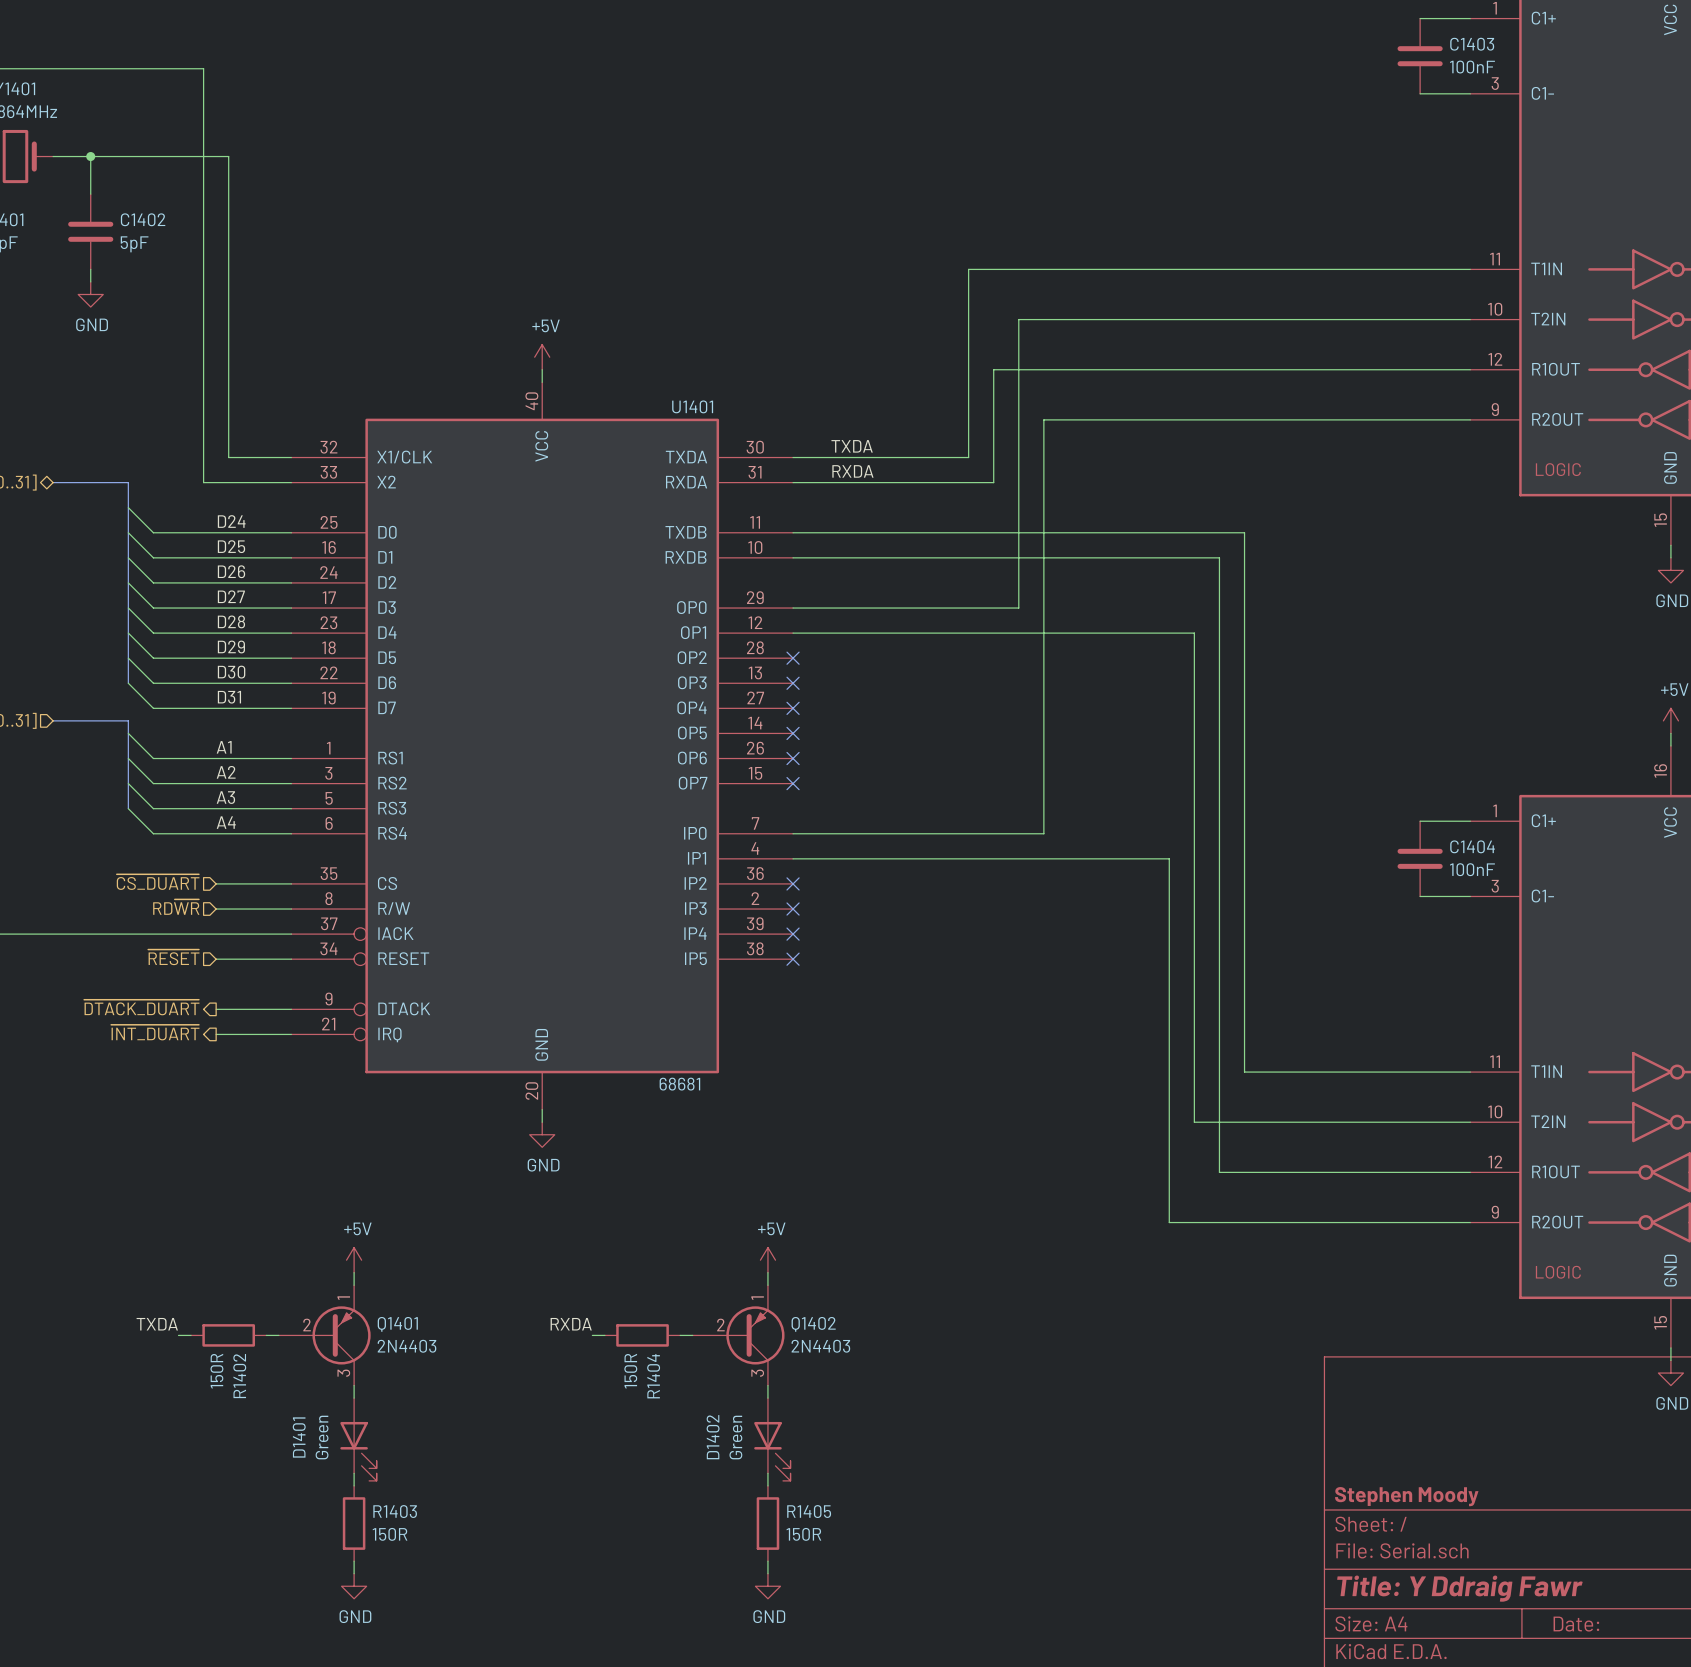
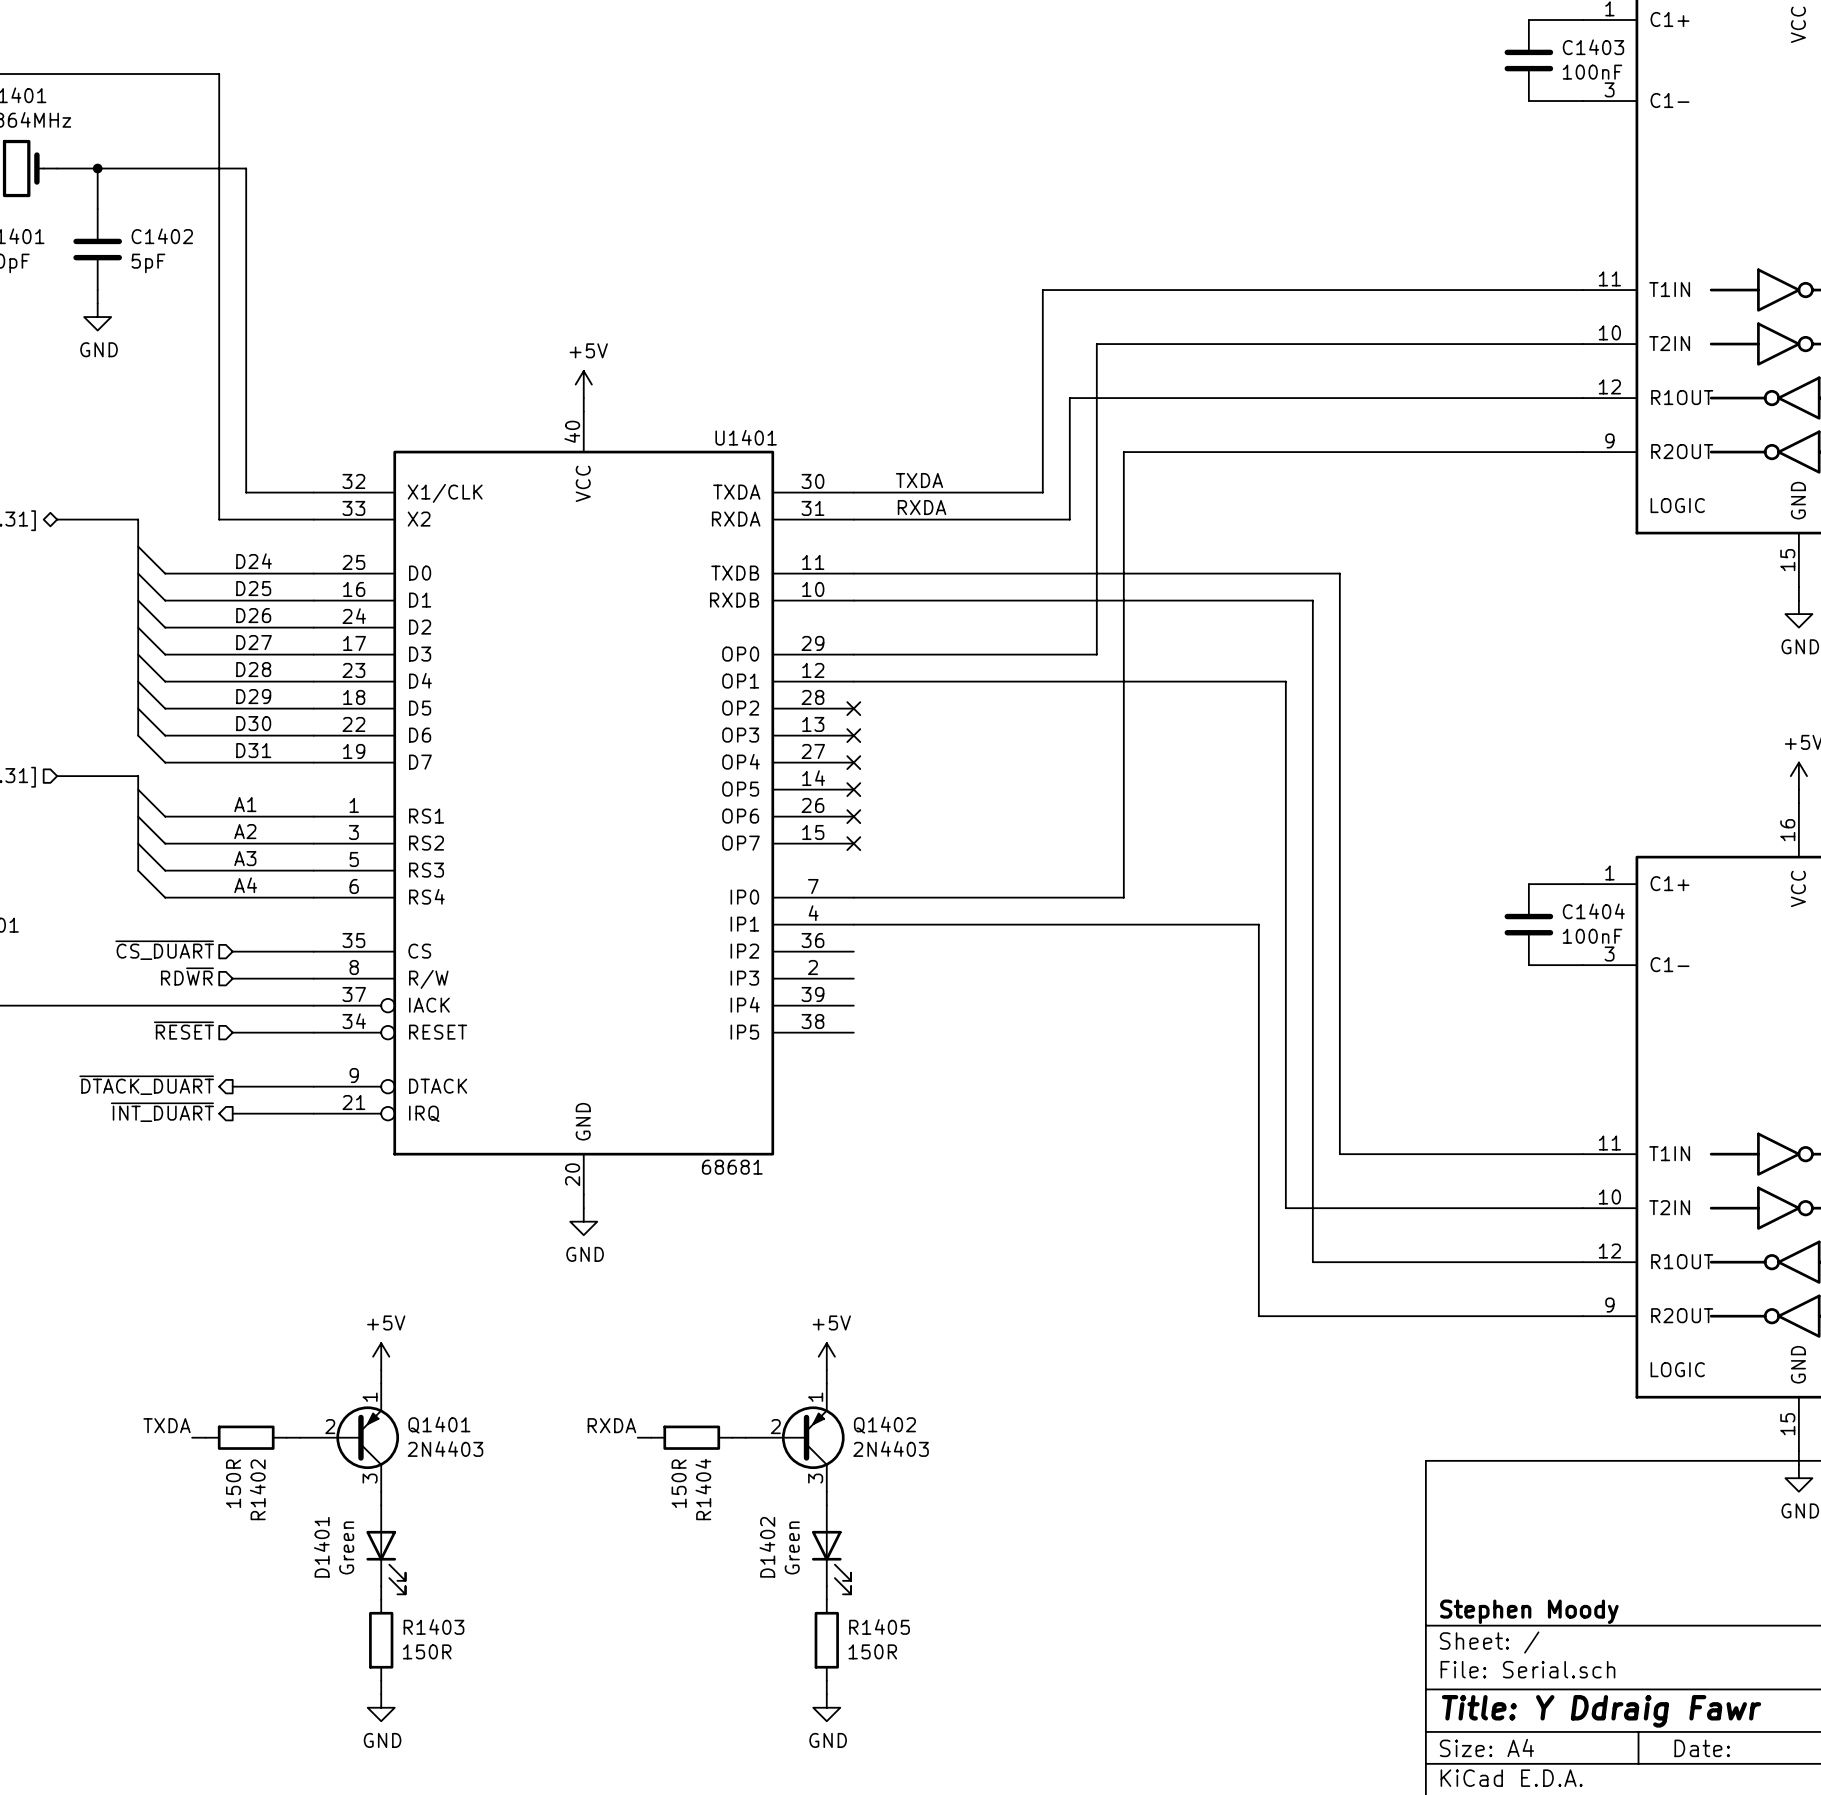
no-connect mark: (793, 883) -> none
no-connect mark: (793, 909) -> none
no-connect mark: (793, 934) -> none
no-connect mark: (793, 959) -> none

